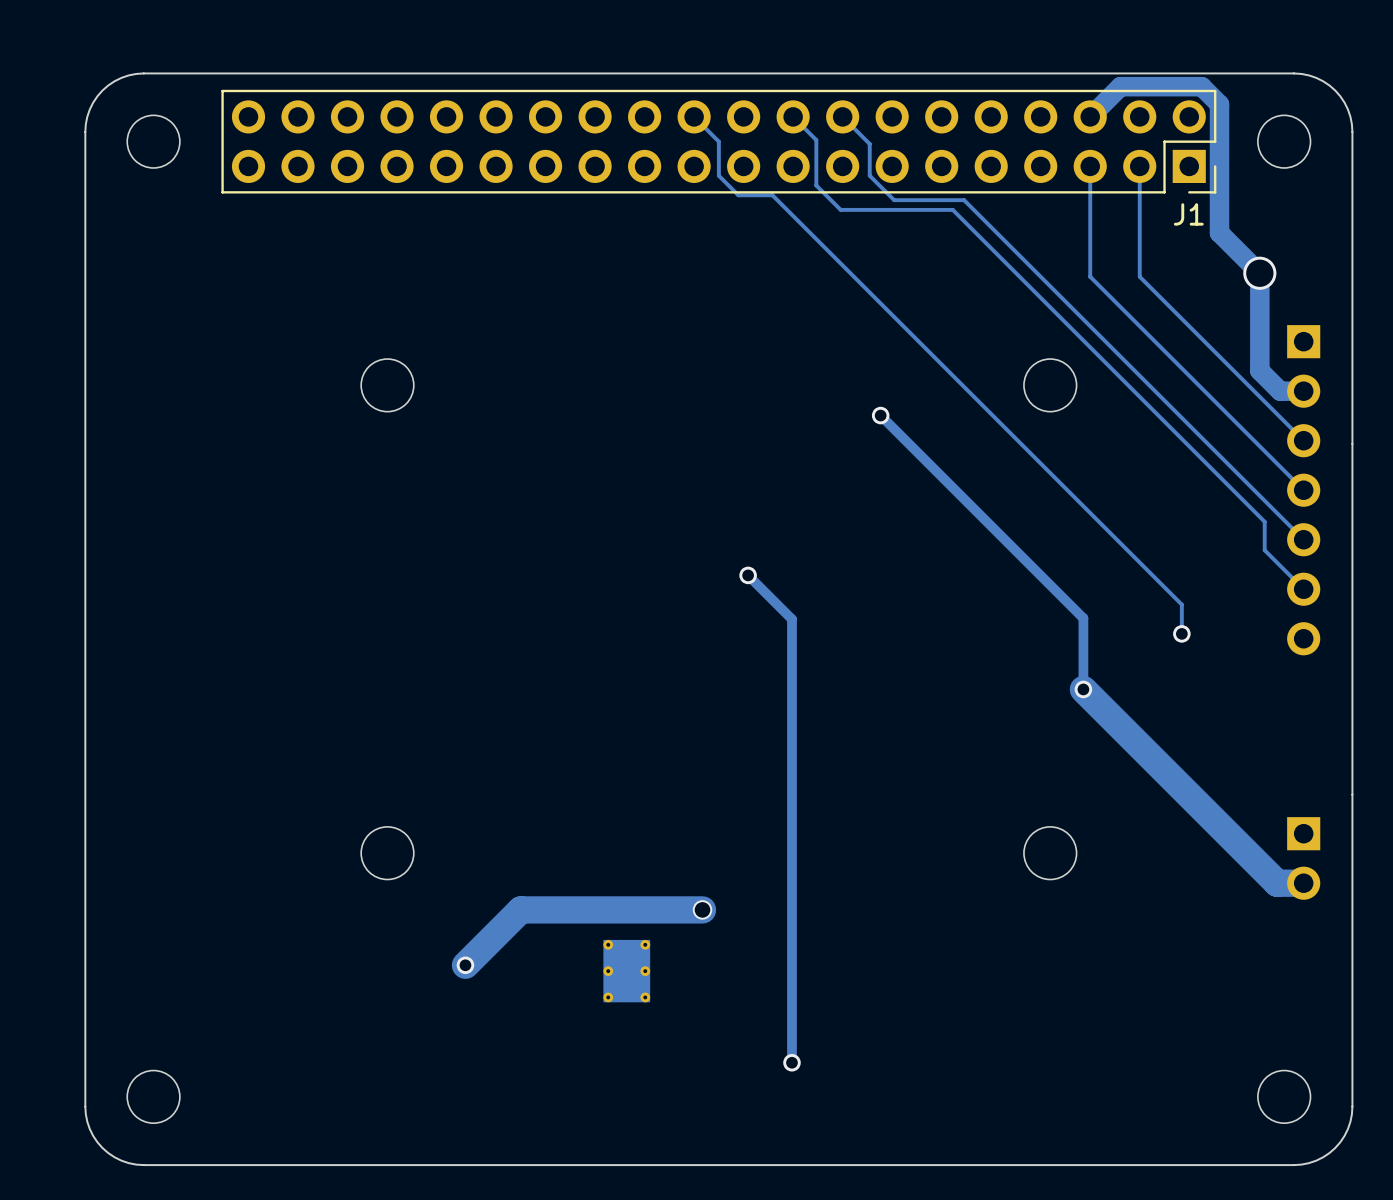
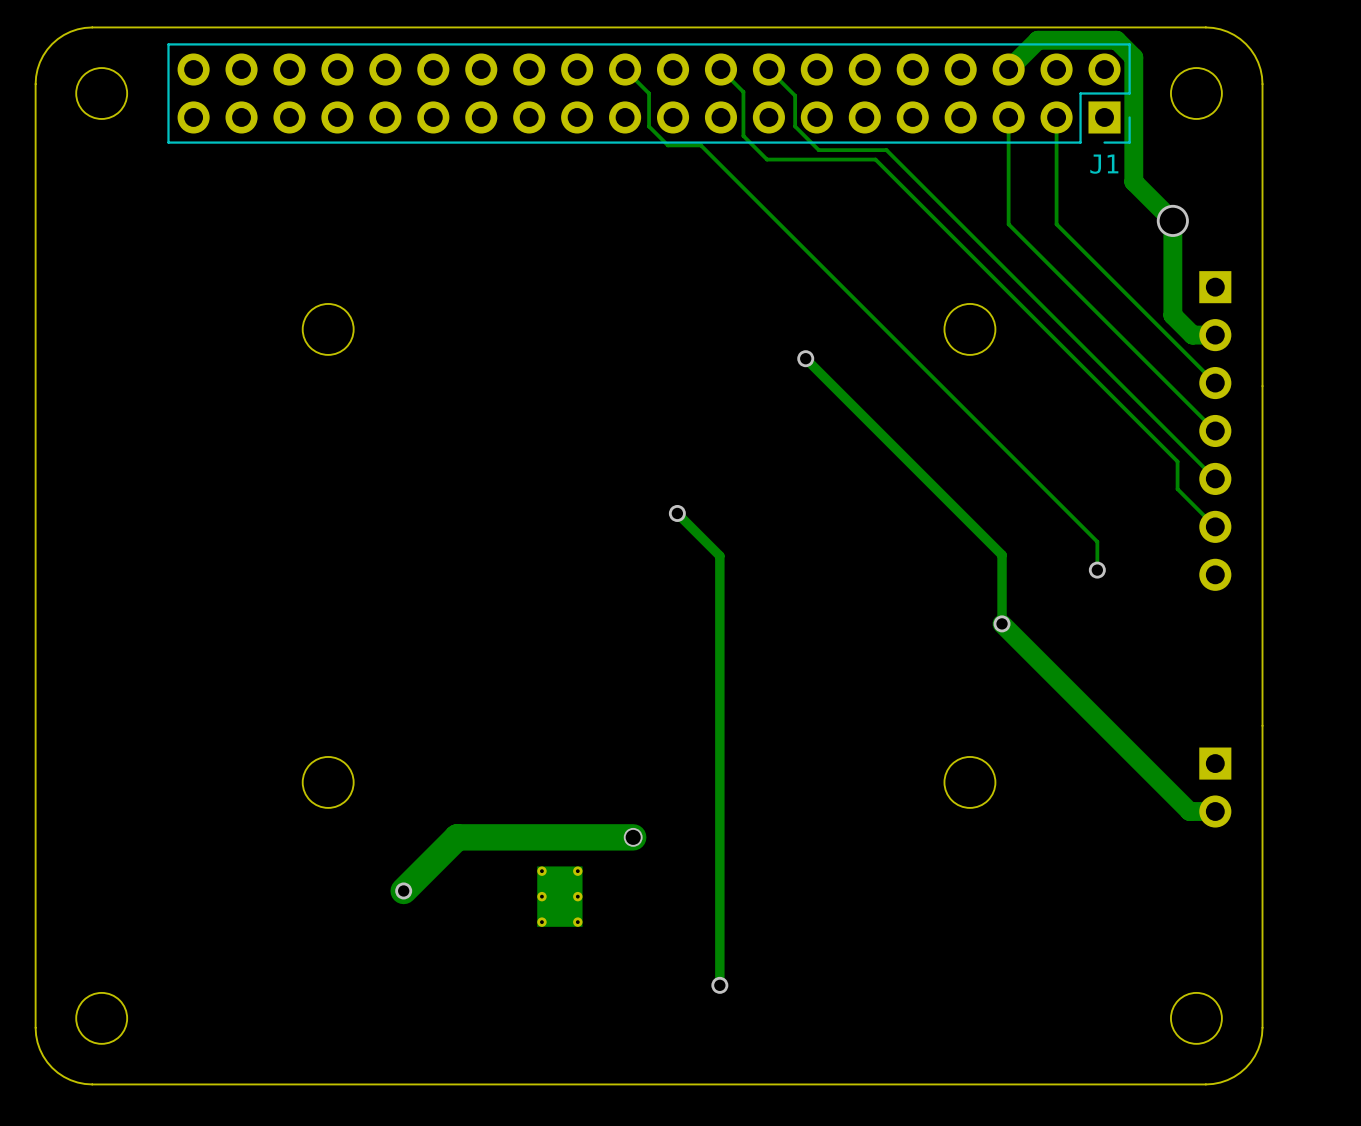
track width: thick (1083, 689) (1277, 883) (1303, 883) -> thin (1002, 623) (1189, 811) (1215, 811)

